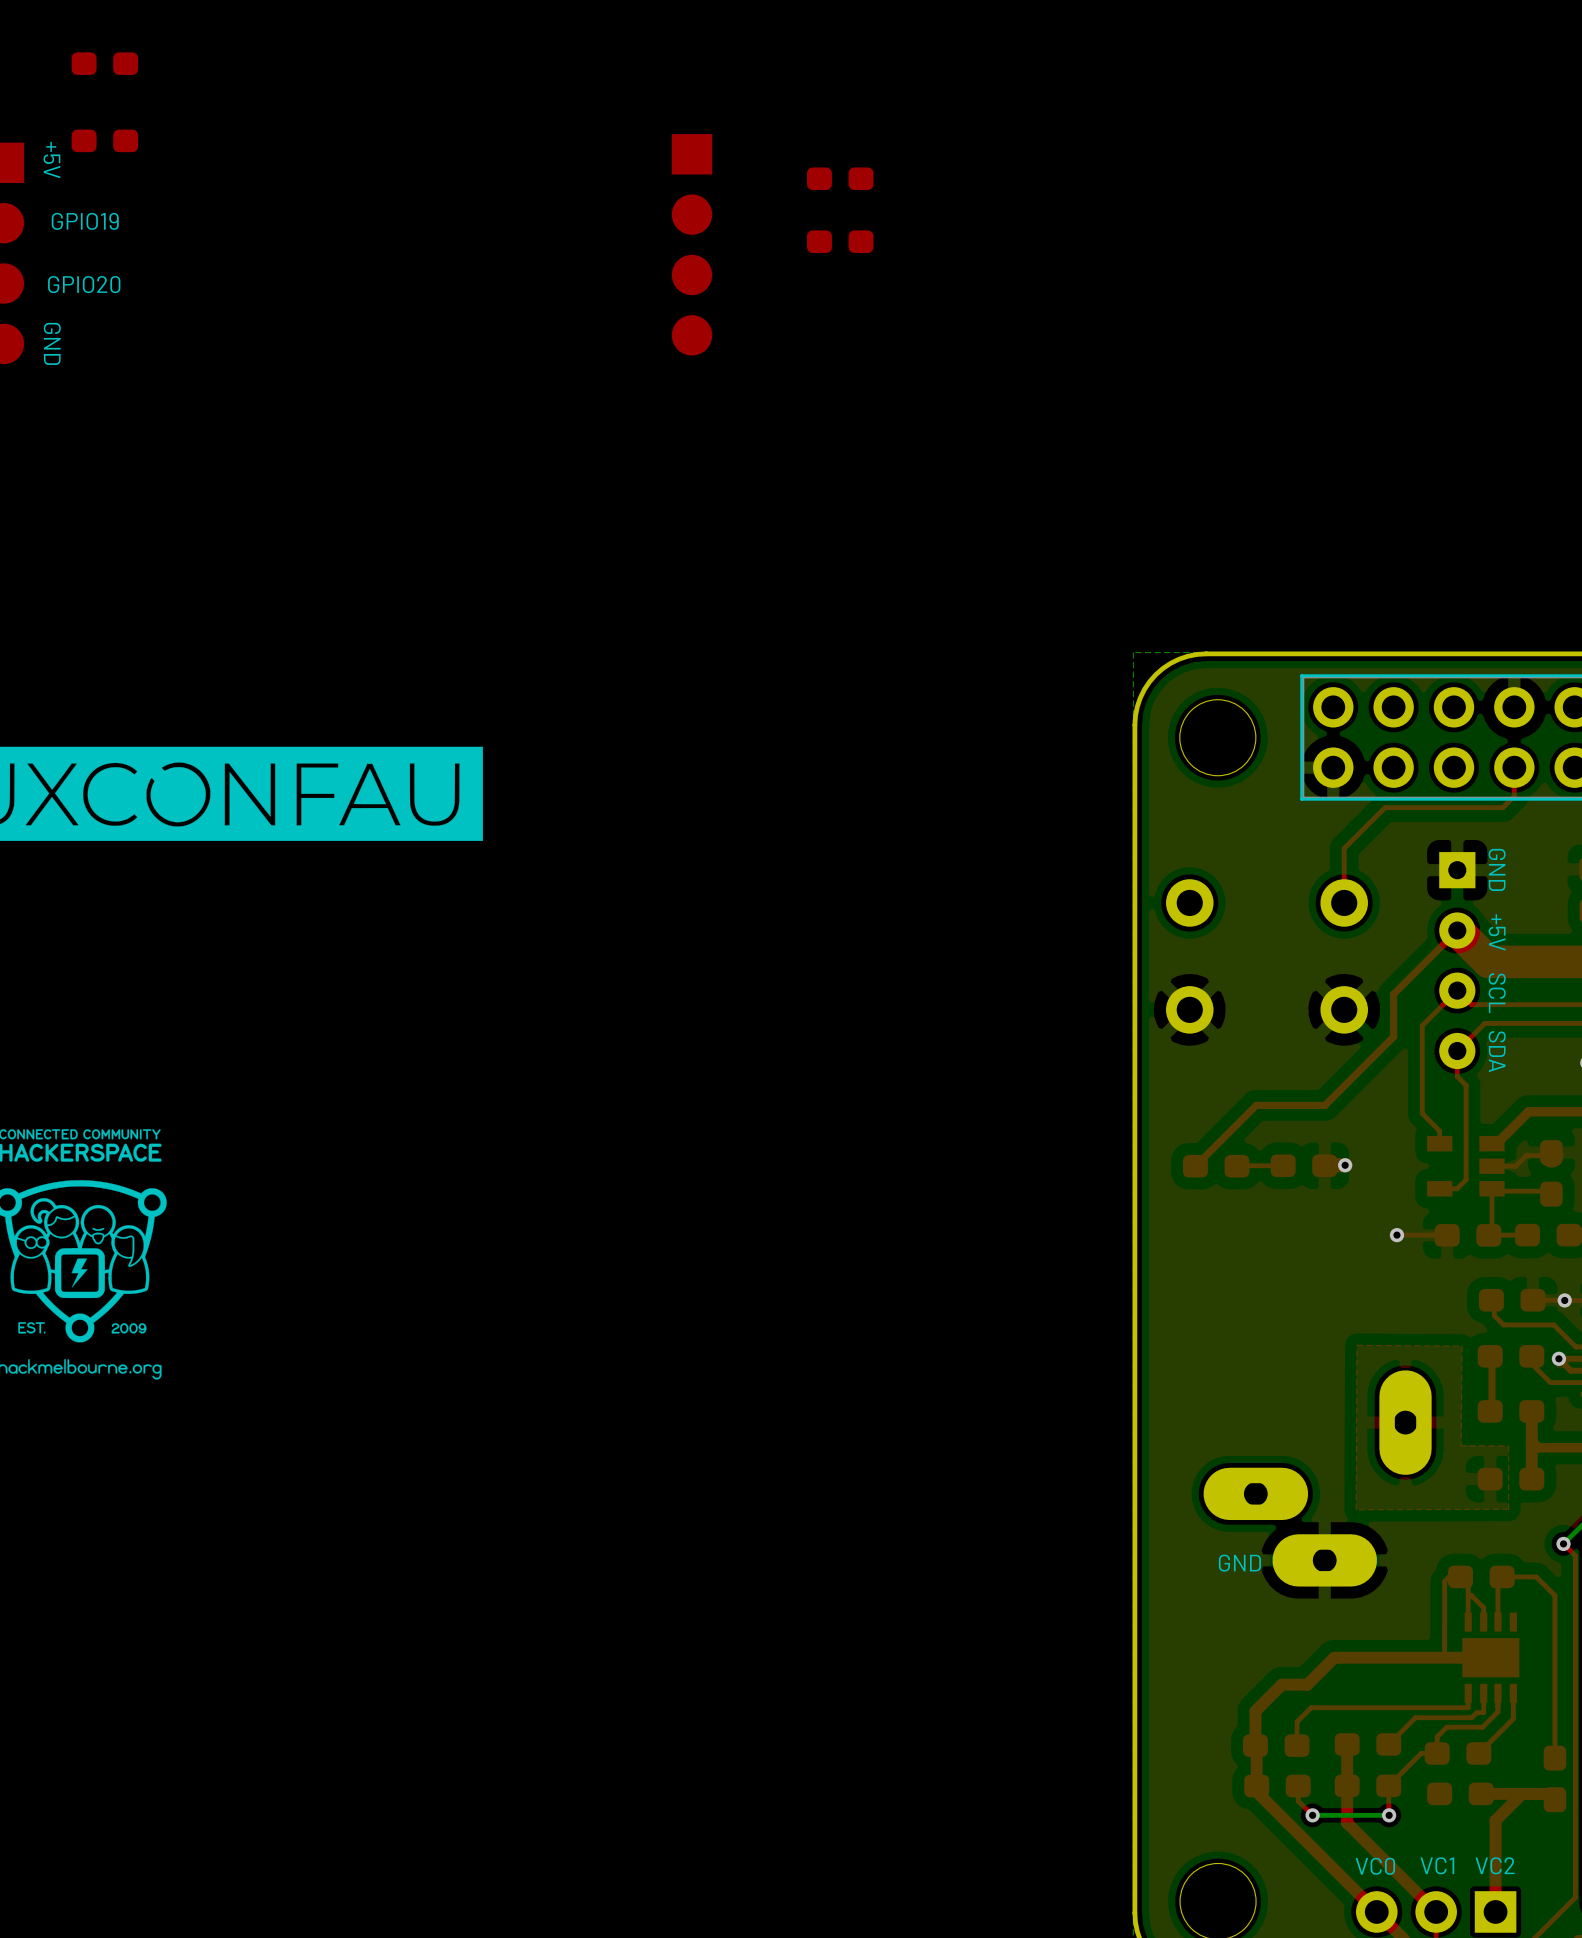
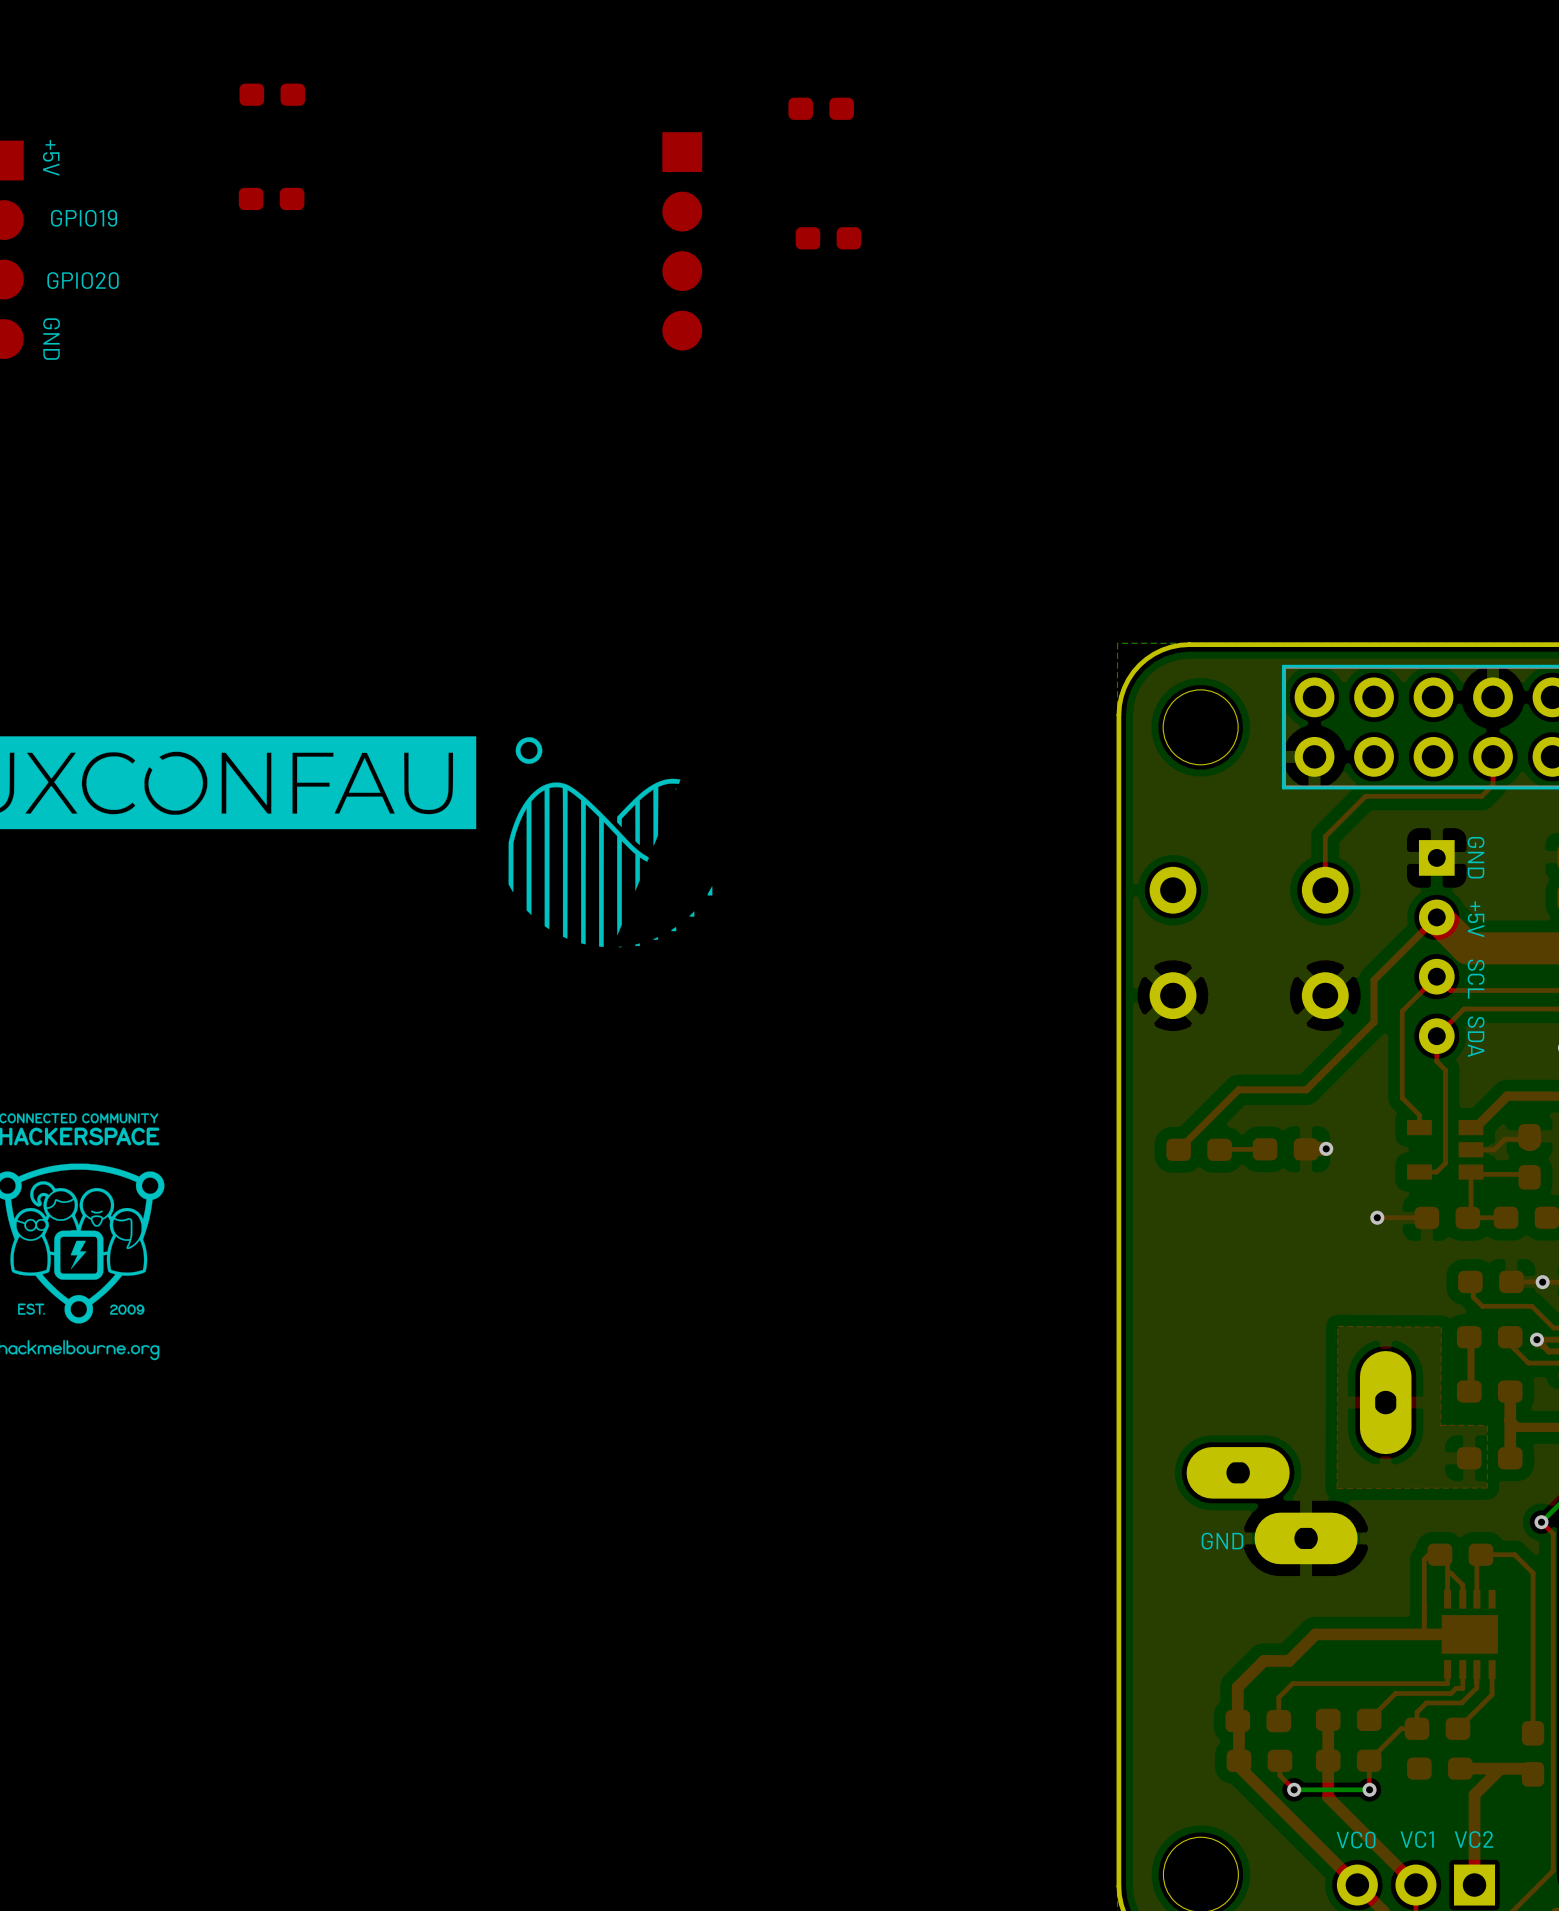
part: (104, 63) -> none
part: none -> (272, 94)
part: (104, 140) -> none
part position: (840, 178) -> (821, 108)
part: none -> (271, 198)
drawing: none -> [508, 737, 713, 948]

